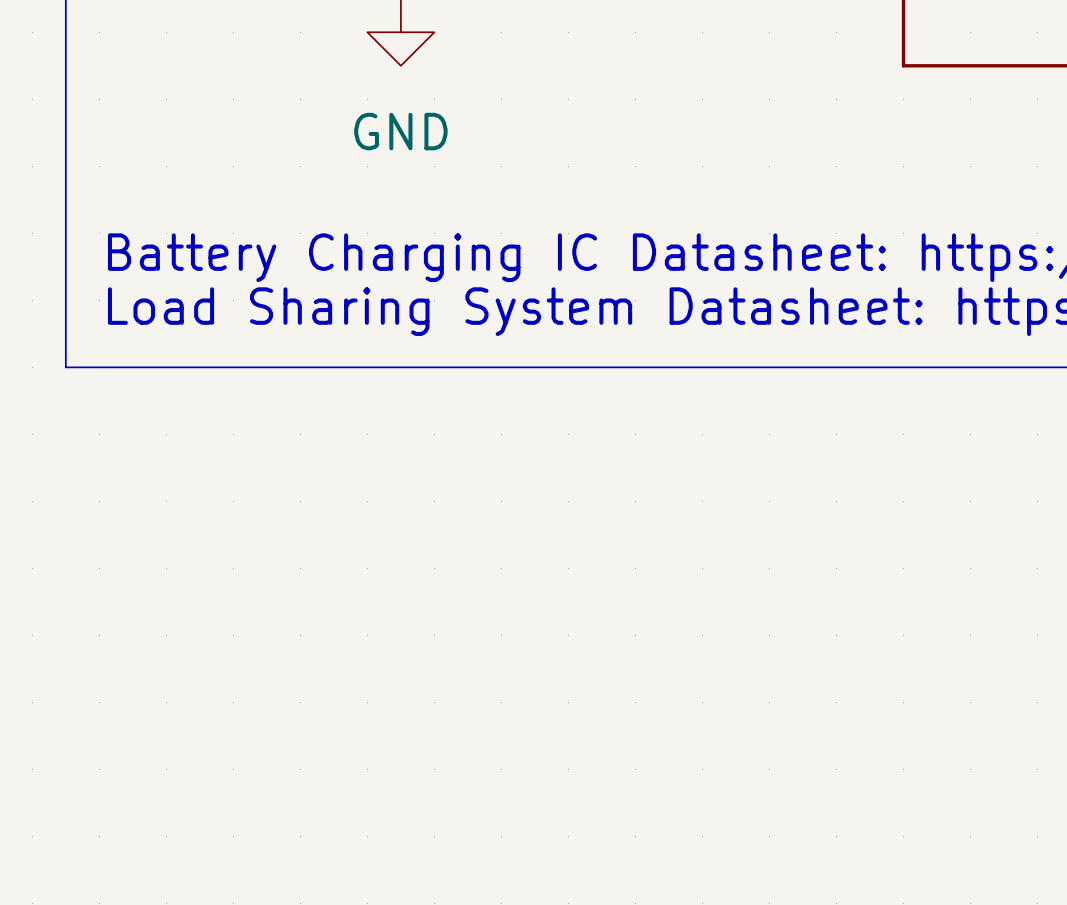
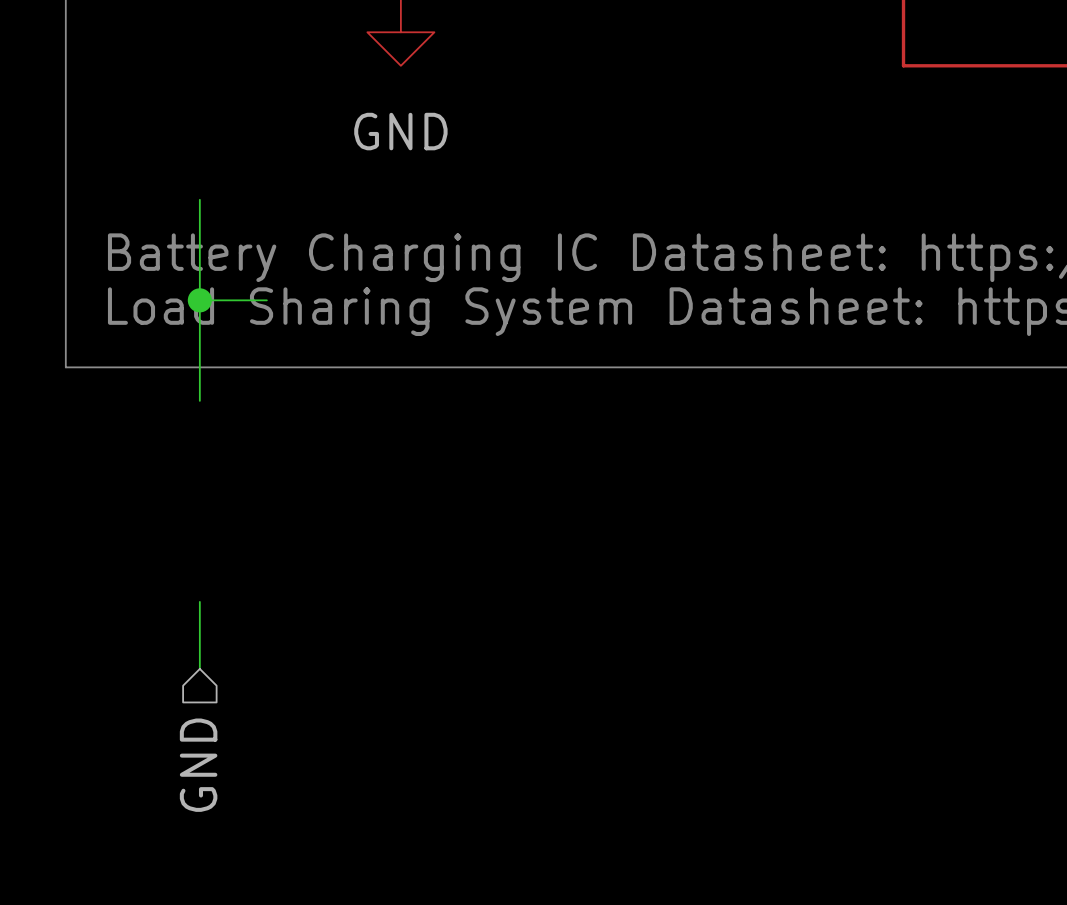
wire: none -> (199, 199) (199, 400)
wire: none -> (199, 300) (266, 300)
junction: none -> (199, 300)
wire: none -> (199, 601) (199, 668)
hierarchical label: none -> GND (198, 765)

